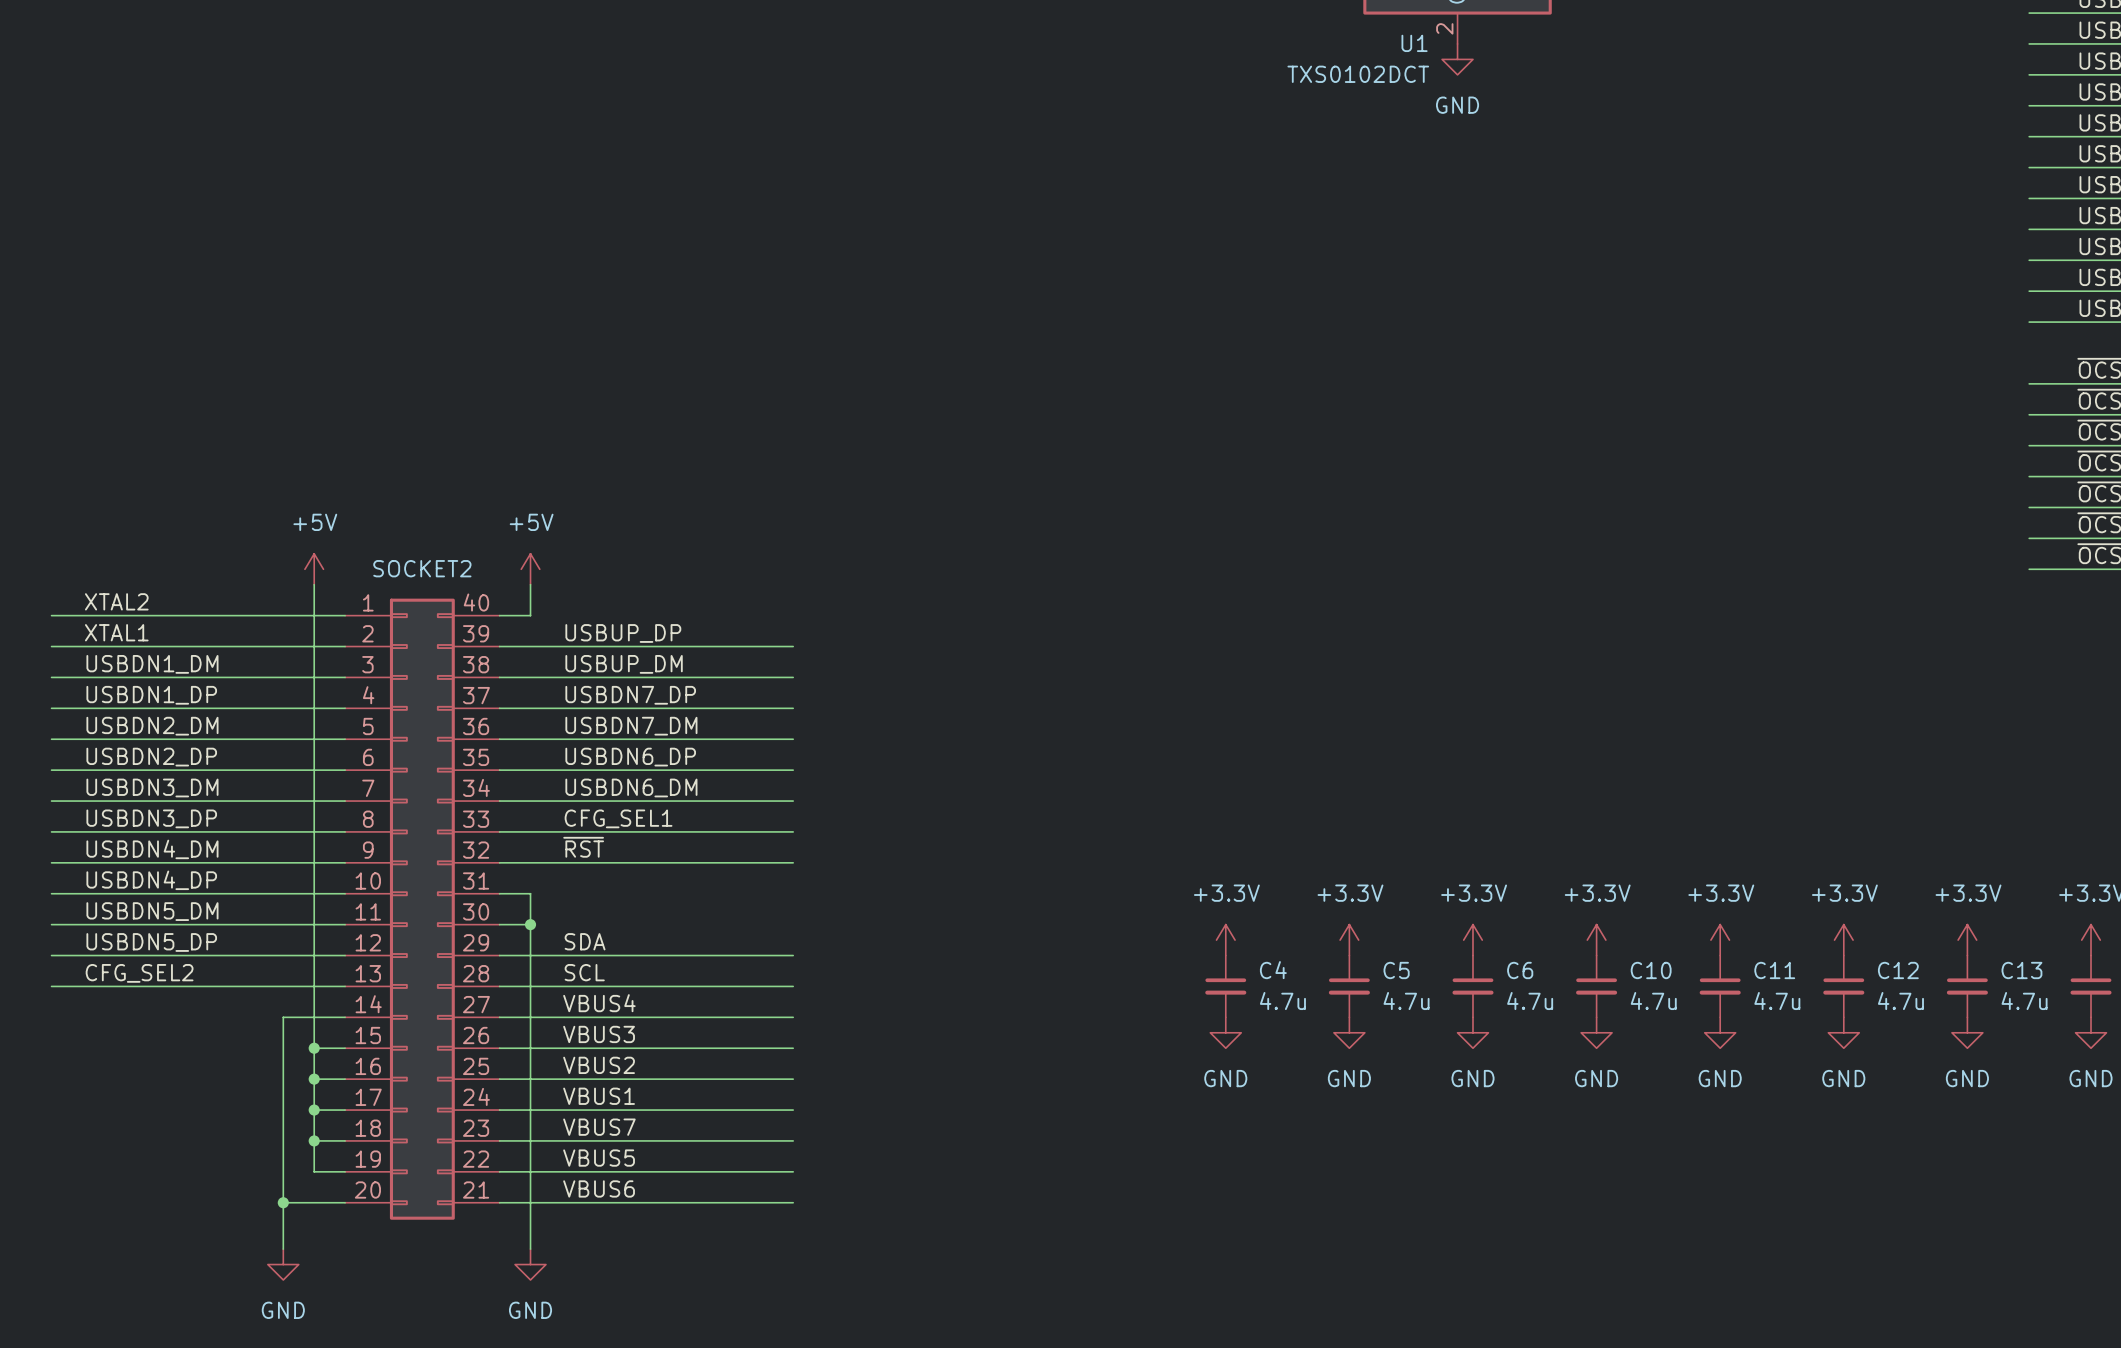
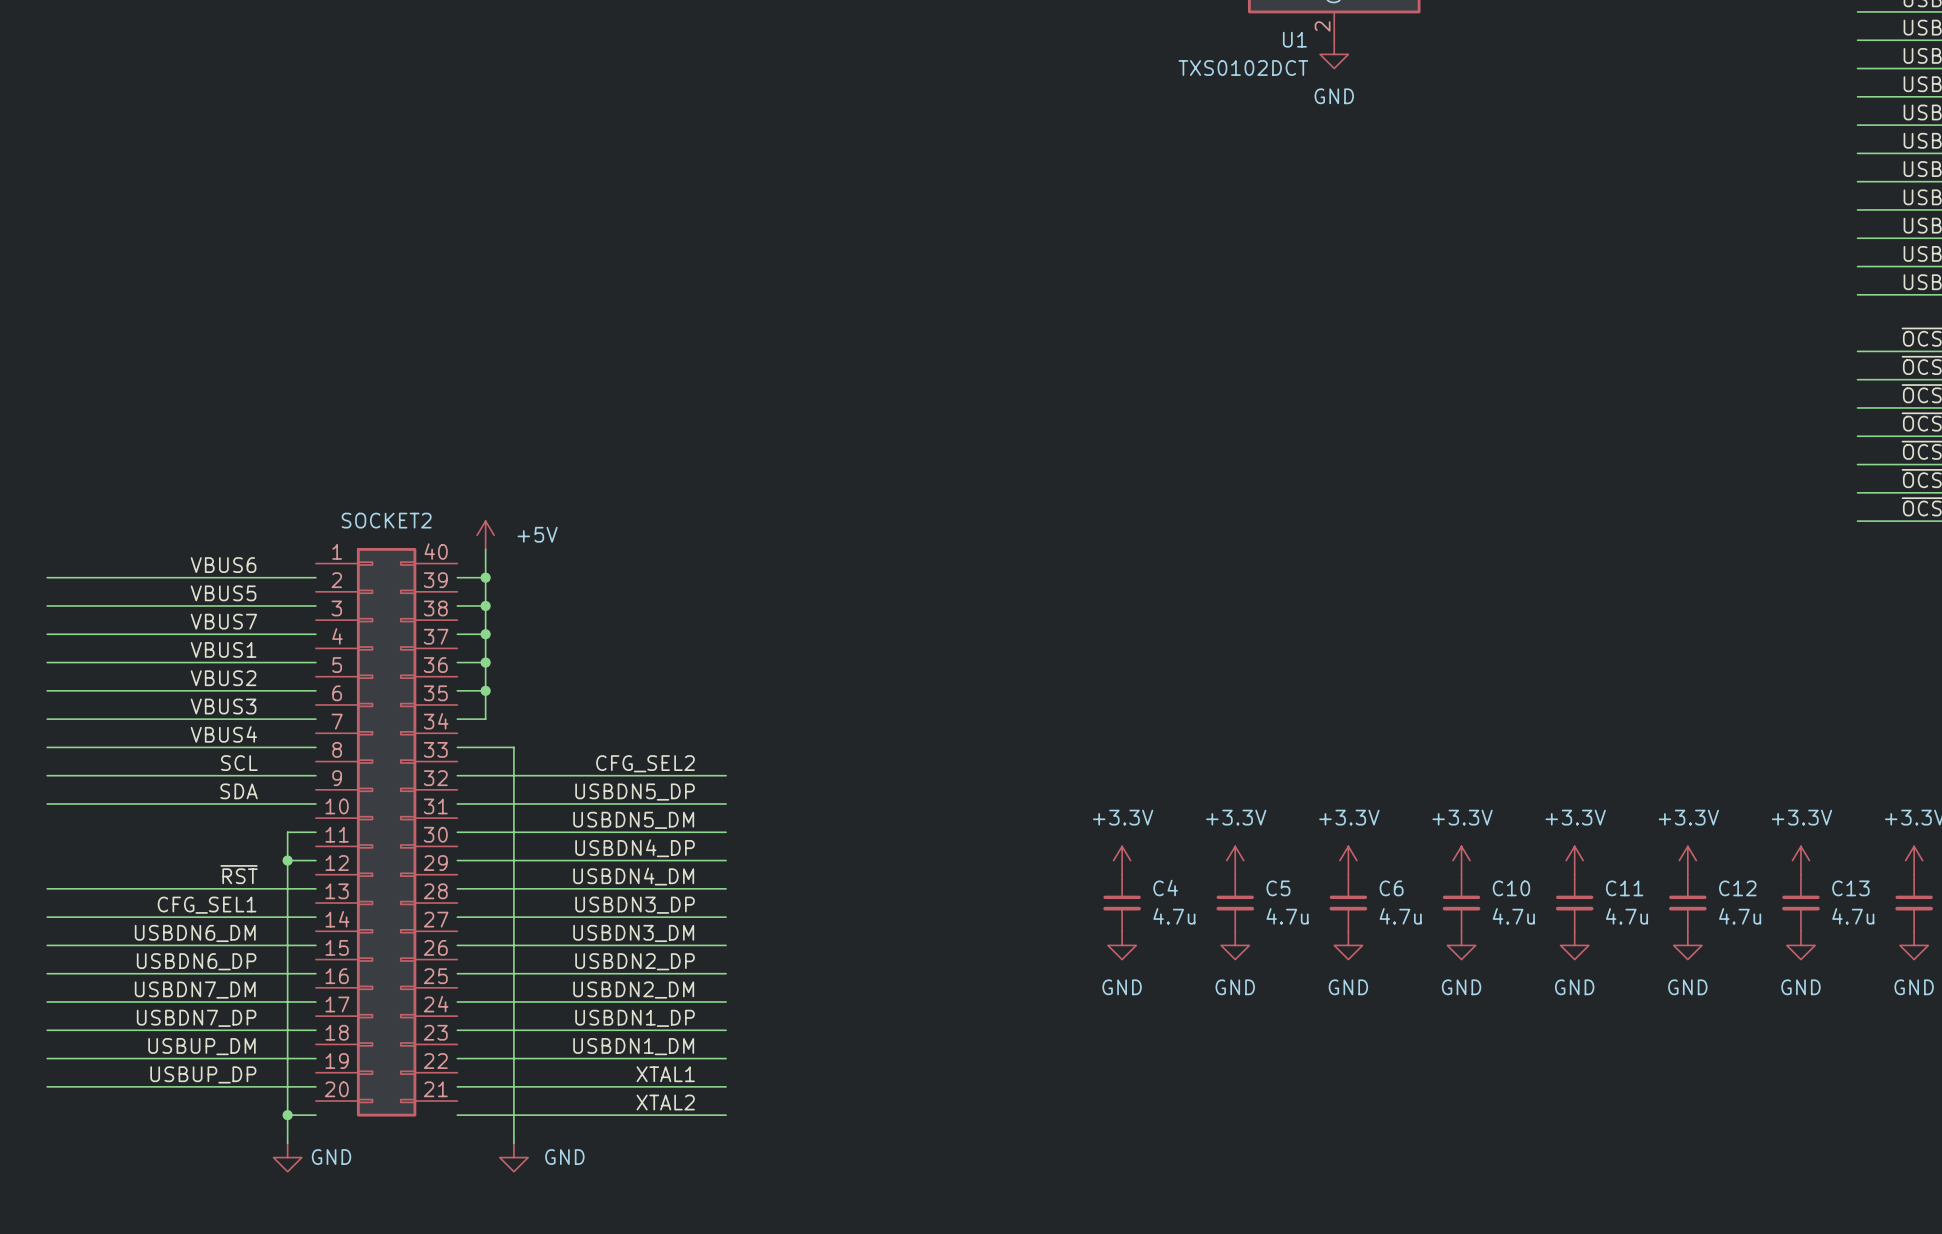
power symbol text position: +5V (531, 522) -> +5V (537, 534)
power symbol: +5V (314, 569) -> none
power symbol position: +5V (530, 569) -> +5V (485, 535)
wire: (314, 584) (314, 909) -> (315, 832) (287, 832)
label: XTAL2 (116, 601) -> none
wire: (51, 615) (345, 615) -> (47, 605) (315, 605)
wire: (499, 615) (530, 615) -> (457, 719) (485, 719) (485, 563)
label: none -> VBUS6 (223, 565)
wire: none -> (47, 577) (315, 577)
wire: none -> (457, 577) (485, 577)
junction: none -> (485, 577)
label: XTAL1 (116, 632) -> none
label: USBUP_DP (623, 633) -> none
wire: (51, 646) (345, 646) -> (47, 634) (315, 634)
wire: (499, 646) (793, 646) -> none
label: none -> VBUS5 (223, 593)
wire: none -> (457, 605) (485, 605)
junction: none -> (485, 605)
label: USBDN1_DM (152, 664) -> none
label: USBUP_DM (624, 664) -> none
wire: (51, 677) (345, 677) -> (47, 662) (315, 662)
wire: (499, 677) (793, 677) -> none
label: none -> VBUS7 (223, 621)
wire: none -> (457, 634) (485, 634)
junction: none -> (485, 634)
label: USBDN1_DP (151, 695) -> none
label: USBDN7_DP (630, 695) -> none
wire: (51, 708) (345, 708) -> (47, 690) (315, 690)
wire: (499, 708) (793, 708) -> none
label: none -> VBUS1 (223, 649)
wire: none -> (457, 662) (485, 662)
junction: none -> (485, 662)
label: USBDN2_DM (152, 726) -> none
label: USBDN7_DM (631, 726) -> none
wire: (51, 739) (345, 739) -> (47, 719) (315, 719)
wire: (499, 739) (793, 739) -> (457, 888) (726, 888)
label: none -> VBUS2 (223, 678)
junction: none -> (485, 690)
label: USBDN2_DP (151, 757) -> none
label: USBDN6_DP (630, 757) -> none
wire: (51, 770) (345, 770) -> (47, 747) (315, 747)
wire: (499, 770) (793, 770) -> (457, 860) (726, 860)
label: none -> VBUS3 (223, 706)
label: USBDN3_DM (152, 787) -> none
label: USBDN6_DM (631, 787) -> none
wire: (51, 801) (345, 801) -> (47, 775) (315, 775)
wire: (499, 801) (793, 801) -> (457, 775) (726, 775)
label: none -> VBUS4 (223, 734)
wire: none -> (457, 747) (513, 747) (513, 1143)
label: USBDN3_DP (151, 818) -> none
label: CFG_SEL1 (618, 818) -> CFG_SEL2 (645, 763)
wire: (51, 831) (345, 831) -> (47, 803) (315, 803)
wire: (499, 831) (793, 831) -> (457, 803) (726, 803)
label: none -> SCL (239, 763)
label position: ~{RST} (583, 847) -> ~{RST} (239, 874)
label: USBDN4_DM (152, 849) -> none
wire: (51, 862) (345, 862) -> (47, 1001) (315, 1001)
wire: (499, 862) (793, 862) -> (457, 832) (726, 832)
label: none -> USBDN5_DP (635, 792)
label: USBDN4_DP (151, 880) -> none
wire: (51, 893) (345, 893) -> (47, 973) (315, 973)
wire: (499, 893) (530, 893) (530, 1249) -> none
label: none -> USBDN5_DM (633, 820)
label: USBDN5_DM (152, 911) -> none
wire: (51, 924) (345, 924) -> (47, 888) (315, 888)
wire: (499, 924) (530, 924) -> (457, 690) (485, 690)
junction: (530, 924) -> none
label: none -> USBDN4_DP (635, 848)
junction: none -> (287, 860)
label position: SDA (585, 941) -> SDA (239, 791)
label: USBDN5_DP (151, 942) -> none
wire: (51, 955) (345, 955) -> (47, 917) (315, 917)
wire: (499, 955) (793, 955) -> (457, 917) (726, 917)
label: none -> USBDN4_DM (633, 876)
label: SCL (584, 972) -> none
label: CFG_SEL2 (139, 973) -> CFG_SEL1 (207, 905)
wire: (51, 986) (345, 986) -> (47, 945) (315, 945)
wire: (499, 986) (793, 986) -> (457, 945) (726, 945)
label: none -> USBDN3_DP (635, 905)
label: VBUS4 (599, 1003) -> none
wire: (345, 1017) (283, 1017) (283, 1249) -> none
wire: (499, 1017) (793, 1017) -> (457, 973) (726, 973)
label: none -> USBDN6_DM (195, 933)
label: none -> USBDN3_DM (633, 933)
label: VBUS3 (599, 1034) -> none
wire: (314, 1048) (345, 1048) -> (287, 860) (315, 860)
junction: (314, 1048) -> none
wire: (499, 1048) (793, 1048) -> (457, 1001) (726, 1001)
label: none -> USBDN6_DP (196, 961)
label: none -> USBDN2_DP (635, 961)
label: VBUS2 (599, 1065) -> none
wire: (314, 1079) (345, 1079) -> none
junction: (314, 1079) -> none
wire: (499, 1079) (793, 1079) -> (457, 1030) (726, 1030)
label: none -> USBDN7_DM (195, 990)
label: none -> USBDN2_DM (633, 990)
label: VBUS1 (599, 1096) -> none
wire: (314, 1110) (345, 1110) -> none
junction: (314, 1110) -> none
wire: (499, 1110) (793, 1110) -> (457, 1058) (726, 1058)
label: none -> USBDN7_DP (196, 1018)
label: none -> USBDN1_DP (635, 1018)
wire: none -> (47, 1030) (315, 1030)
label: VBUS7 (599, 1127) -> none
wire: (314, 1140) (345, 1140) -> (287, 1115) (315, 1115)
junction: (314, 1140) -> none
wire: (499, 1140) (793, 1140) -> (457, 1086) (726, 1086)
label: none -> USBUP_DM (201, 1046)
label: none -> USBDN1_DM (633, 1046)
wire: none -> (47, 1058) (315, 1058)
label: VBUS5 (599, 1158) -> none
wire: (314, 1171) (345, 1171) -> (287, 1072) (287, 1143)
wire: (499, 1171) (793, 1171) -> (457, 1115) (726, 1115)
label: none -> XTAL1 (665, 1074)
label: none -> USBUP_DP (203, 1074)
wire: none -> (47, 1086) (315, 1086)
label: VBUS6 (599, 1188) -> none
wire: (283, 1202) (345, 1202) -> none
junction position: (283, 1202) -> (287, 1115)
wire: (499, 1202) (793, 1202) -> none
label: none -> XTAL2 (665, 1102)
power symbol position: GND (283, 1264) -> GND (287, 1157)
power symbol position: GND (530, 1264) -> GND (513, 1157)
power symbol text position: GND (283, 1310) -> GND (331, 1157)
power symbol text position: GND (530, 1310) -> GND (564, 1157)

